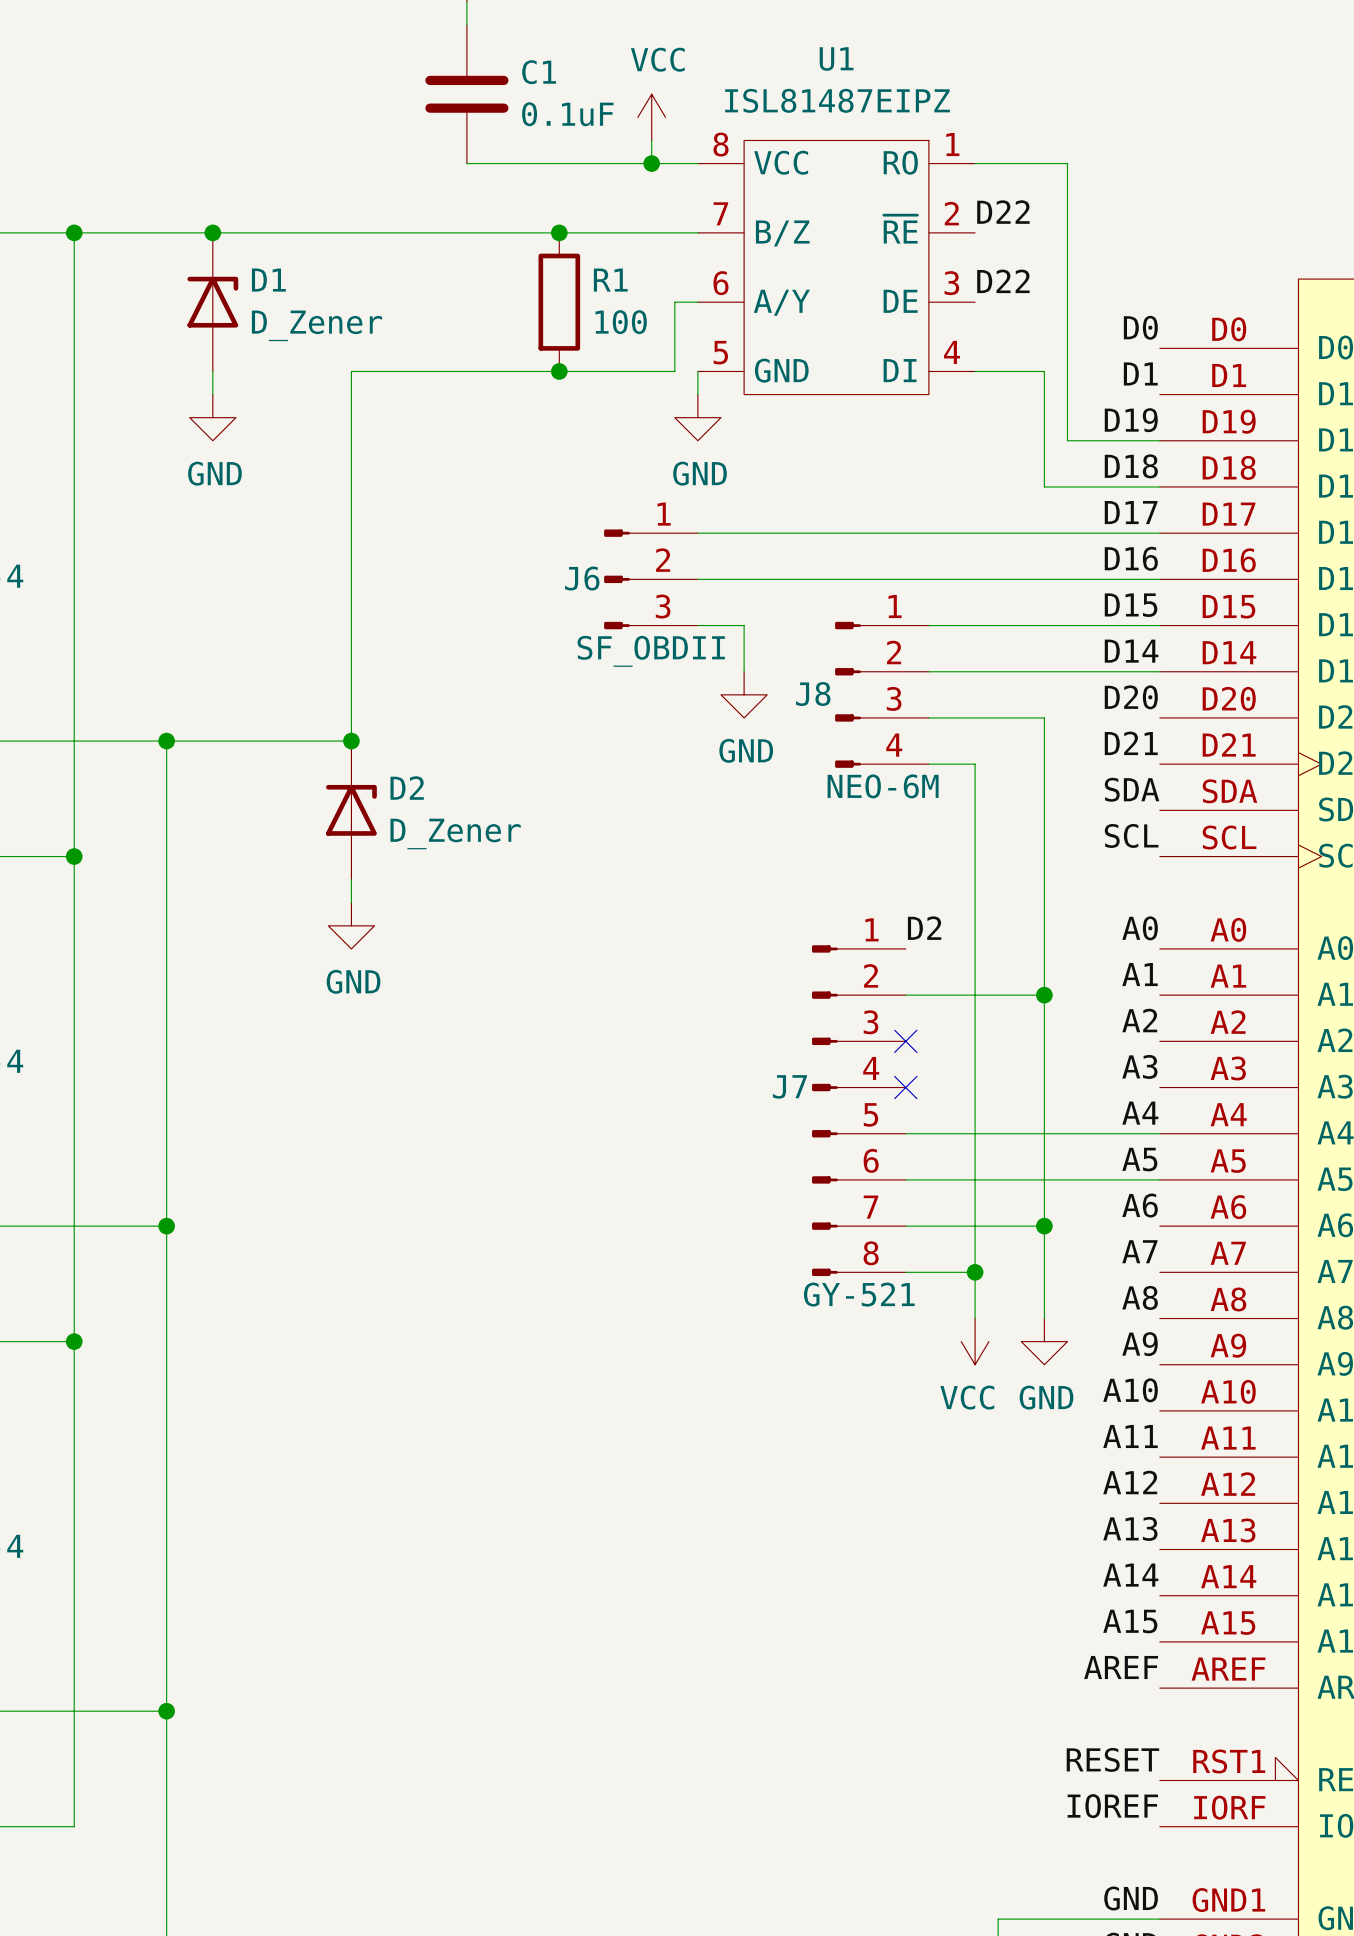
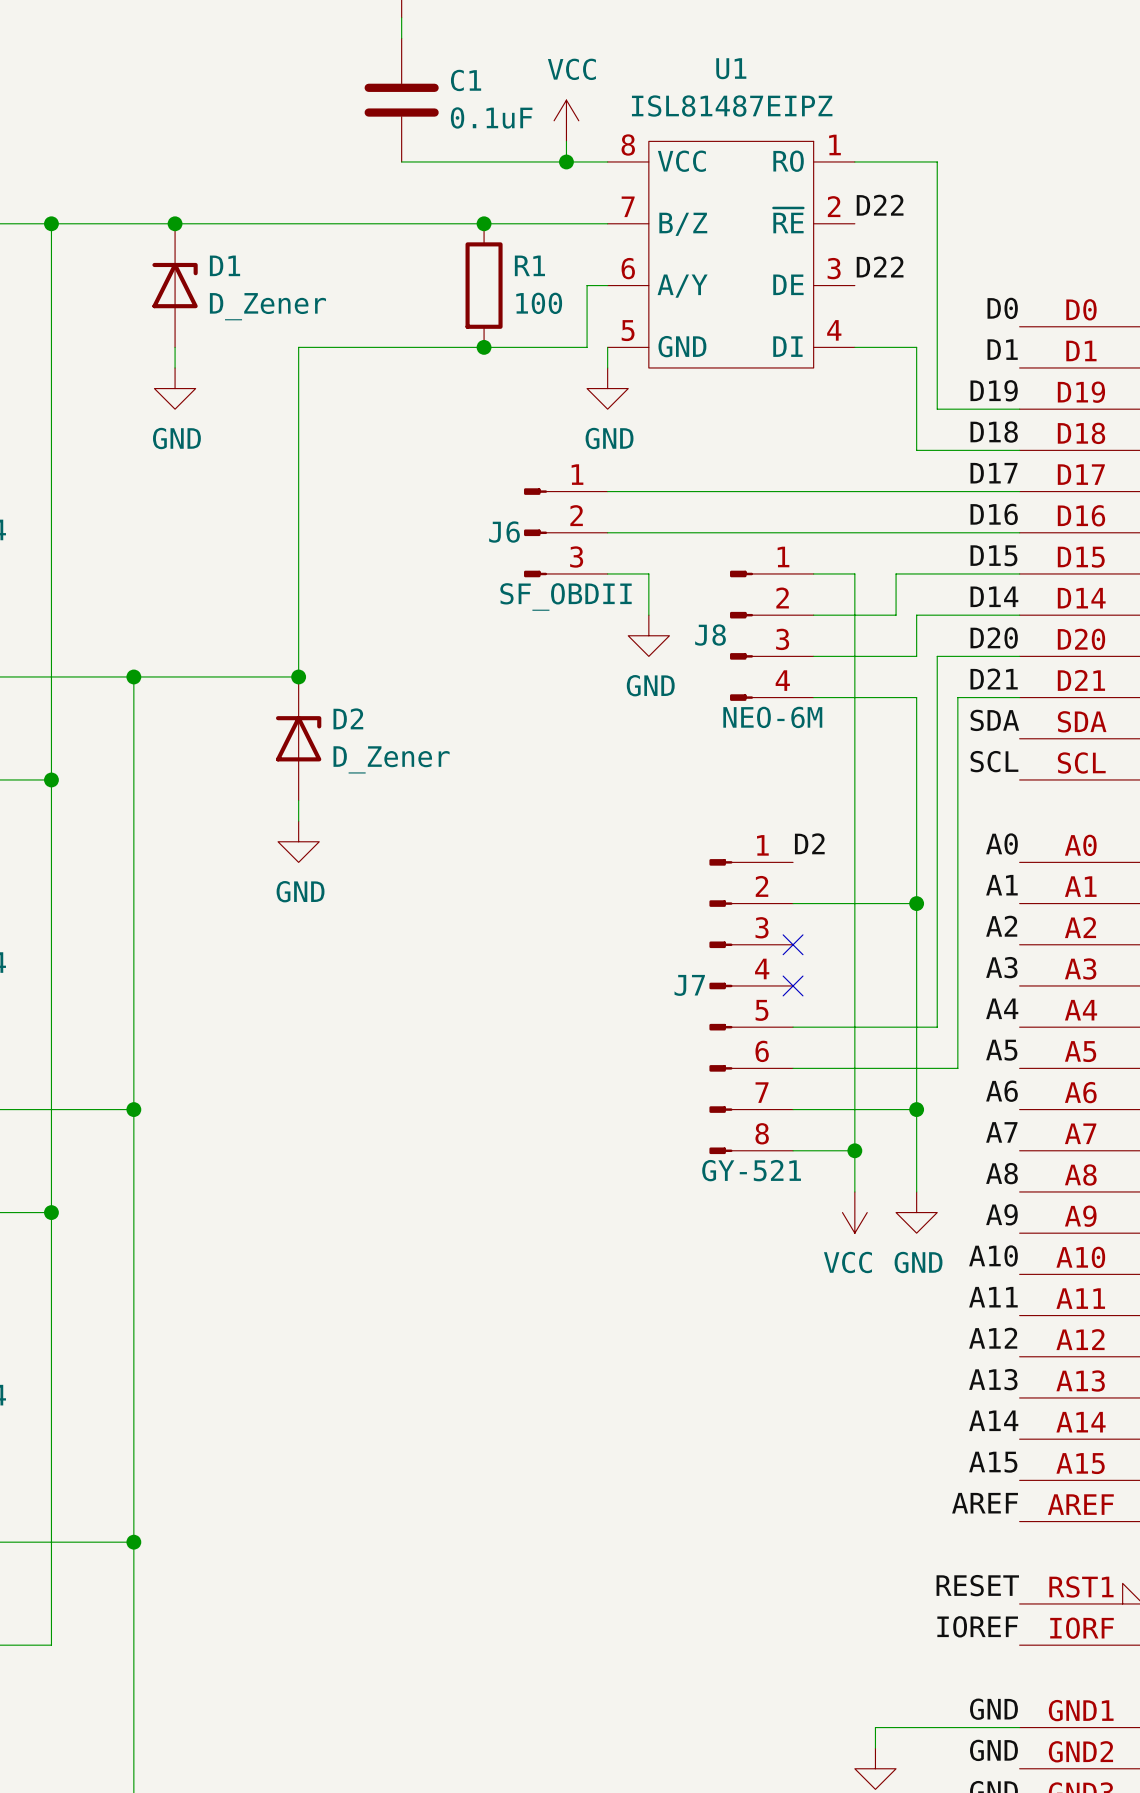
wire: (975, 625) (1021, 625) -> (854, 573) (854, 697) (916, 697)
wire: (1021, 671) (1044, 671) -> (896, 615) (896, 573)
wire: (1044, 717) (1044, 764) -> (916, 656) (916, 615)
wire: (1067, 1133) (1159, 1133) -> (937, 1027) (937, 656) (1019, 656)
wire: (1090, 1179) (1159, 1179) -> (957, 1068) (957, 697) (1019, 697)

